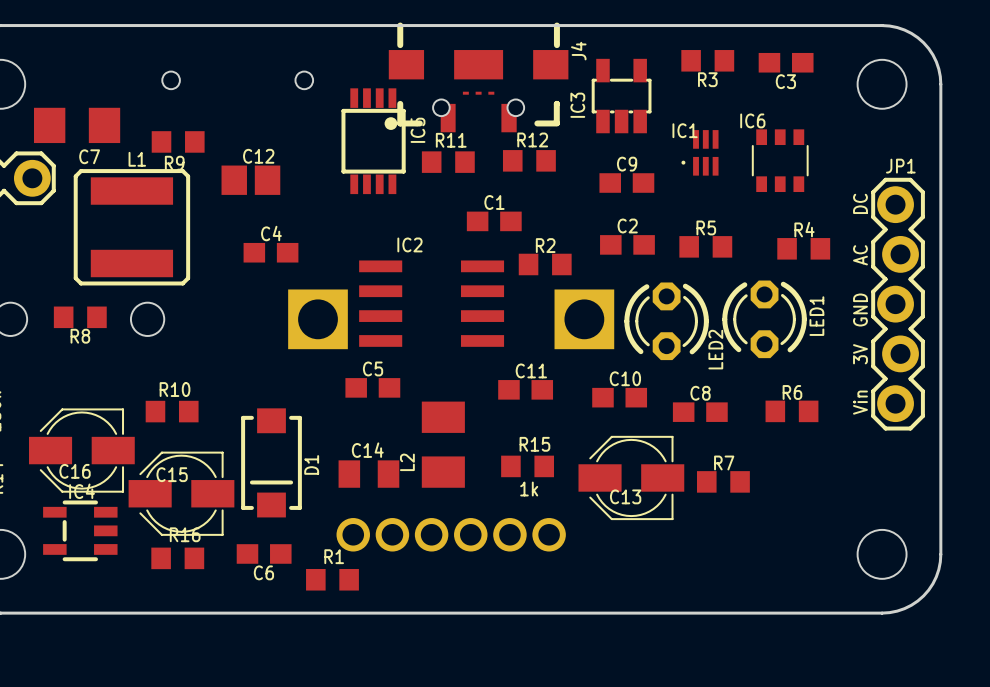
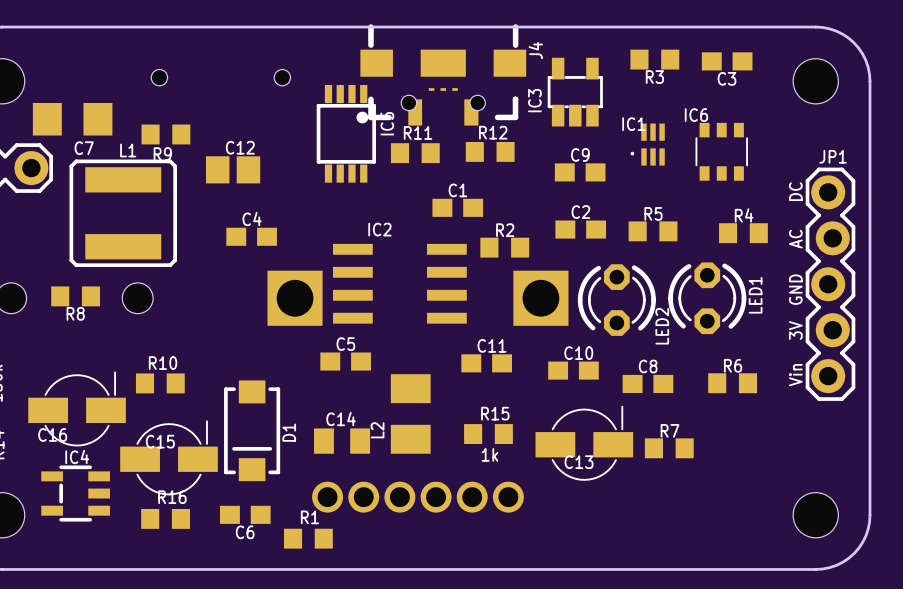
C16 footprint: [29, 408, 135, 493] -> [28, 371, 126, 447]
C13 footprint: [578, 435, 685, 521] -> [535, 405, 634, 481]
C15 footprint: [128, 451, 235, 536] -> [120, 420, 218, 496]

